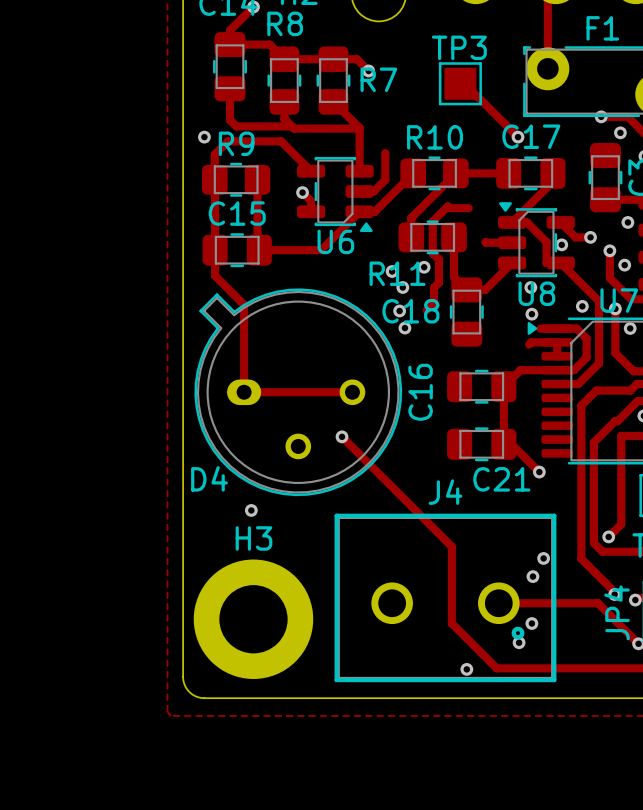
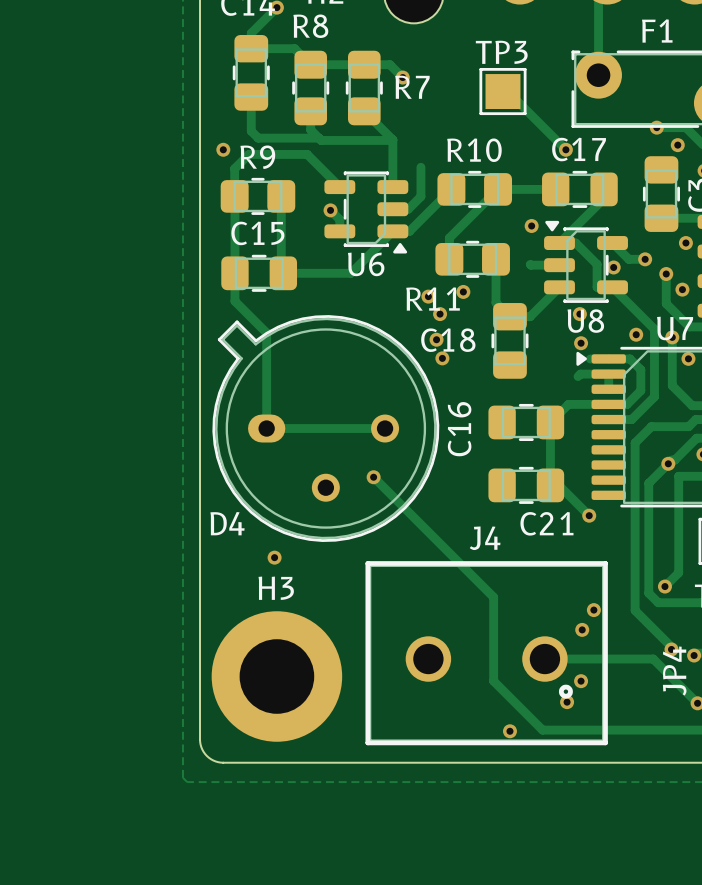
via: none -> (531, 226)
track: (468, 208) (449, 208) (447, 206) (432, 221) (432, 253) (438, 259) (438, 282) (433, 287) (433, 303) (426, 310) -> none
via: none -> (668, 463)

